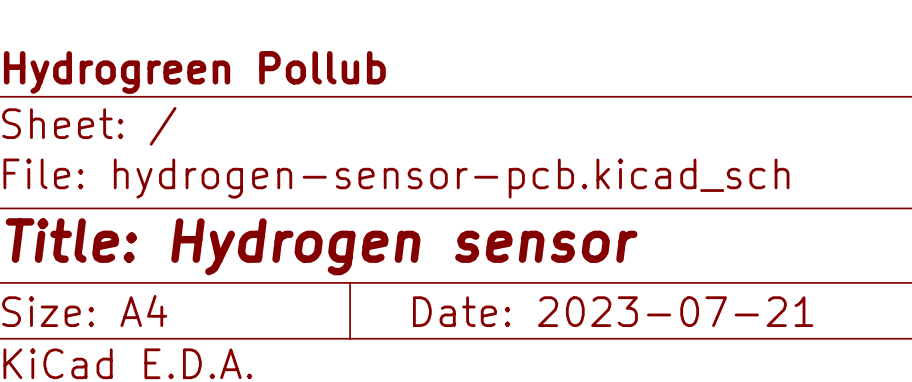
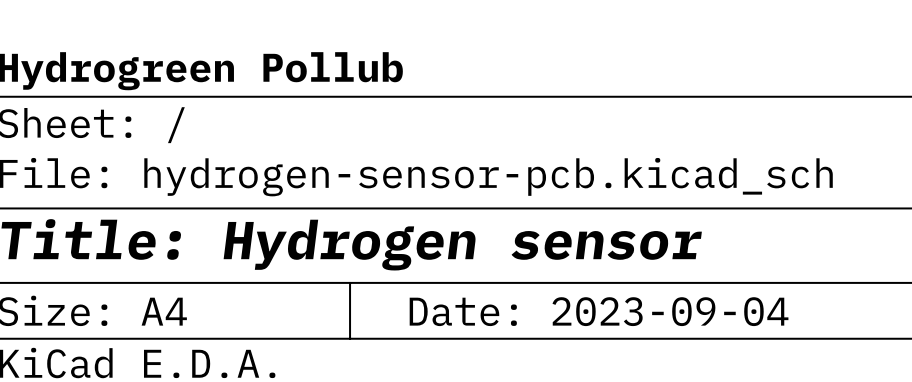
title block: Date: 2023-07-21 (613, 311) -> Date: 2023-09-04 (599, 311)

